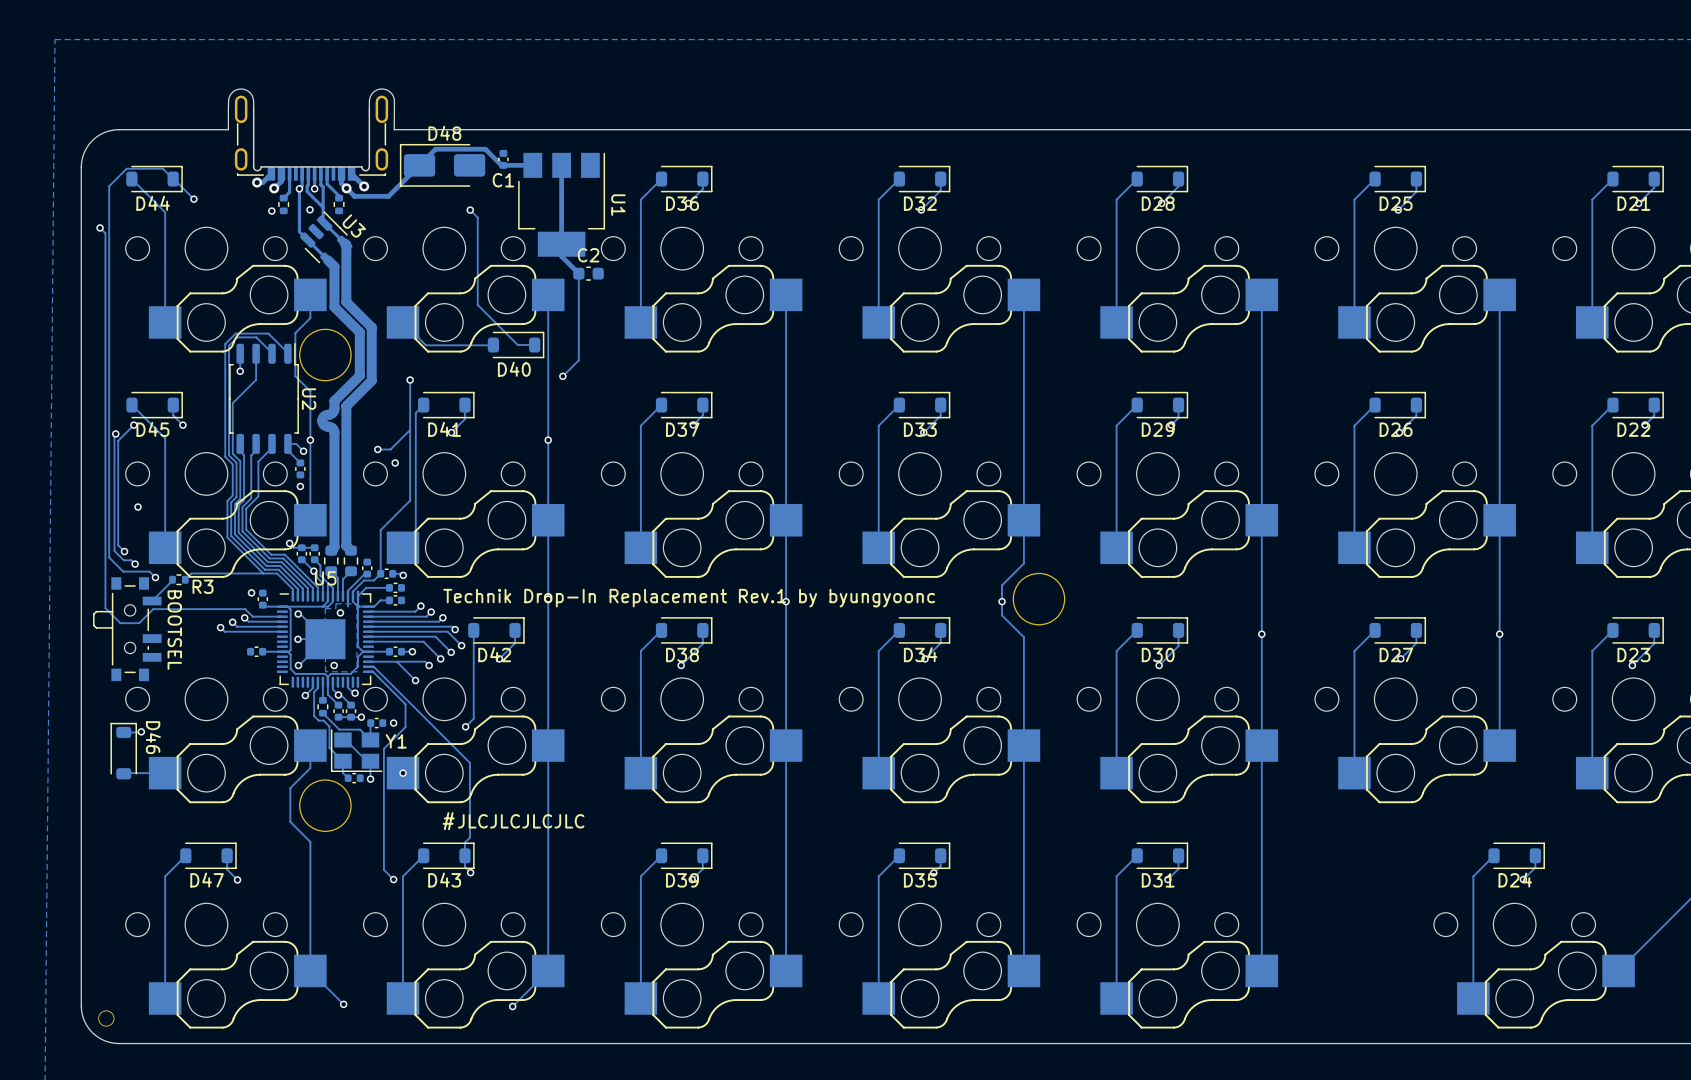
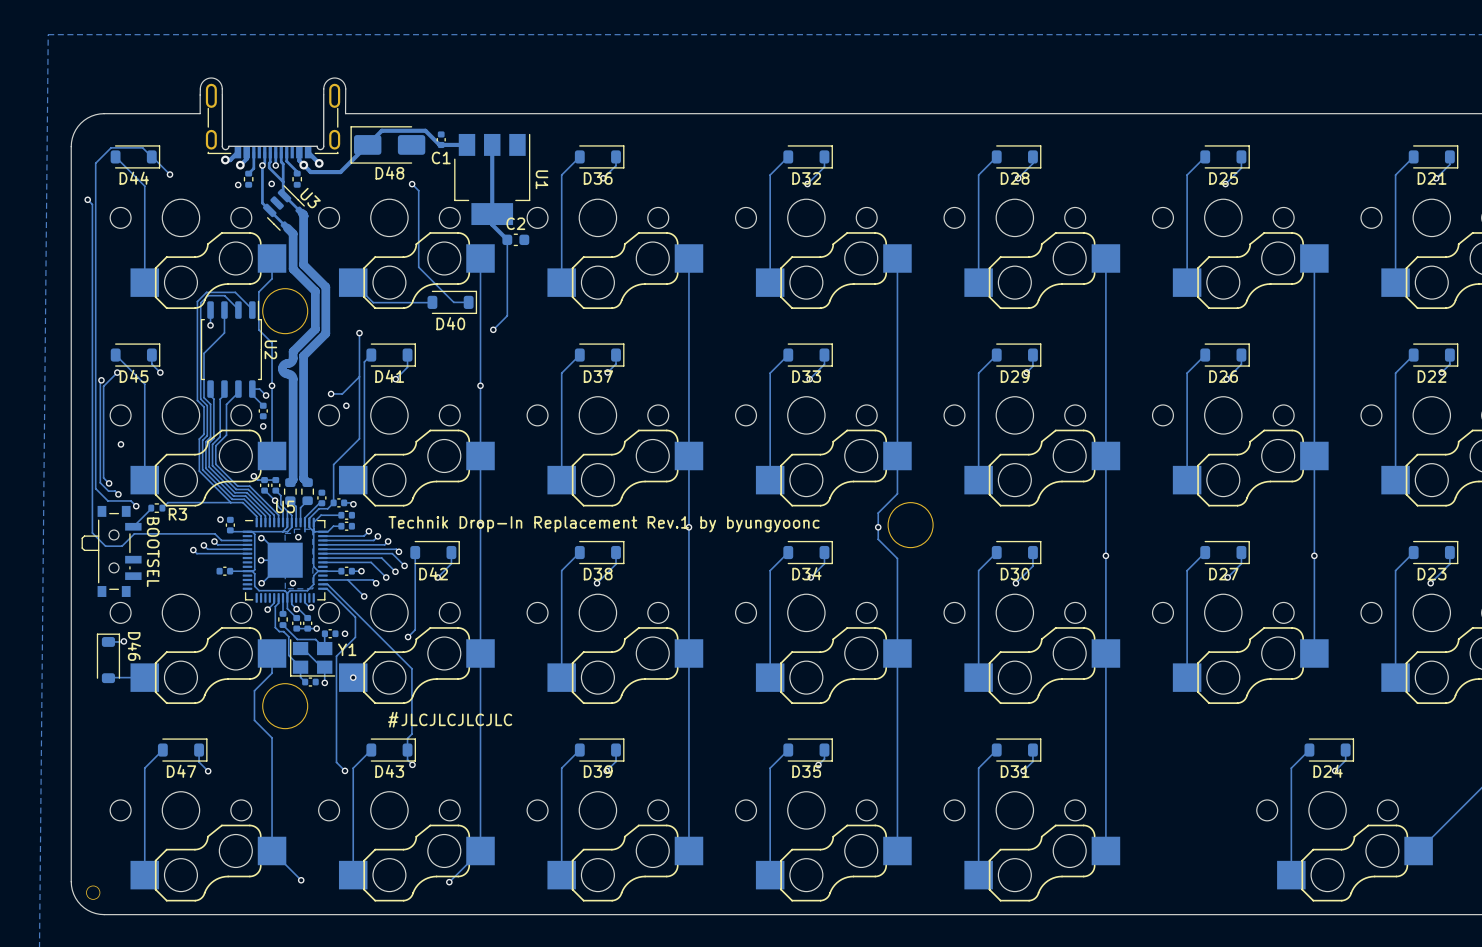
D48 name position: D48 (444, 133) -> D48 (389, 173)

